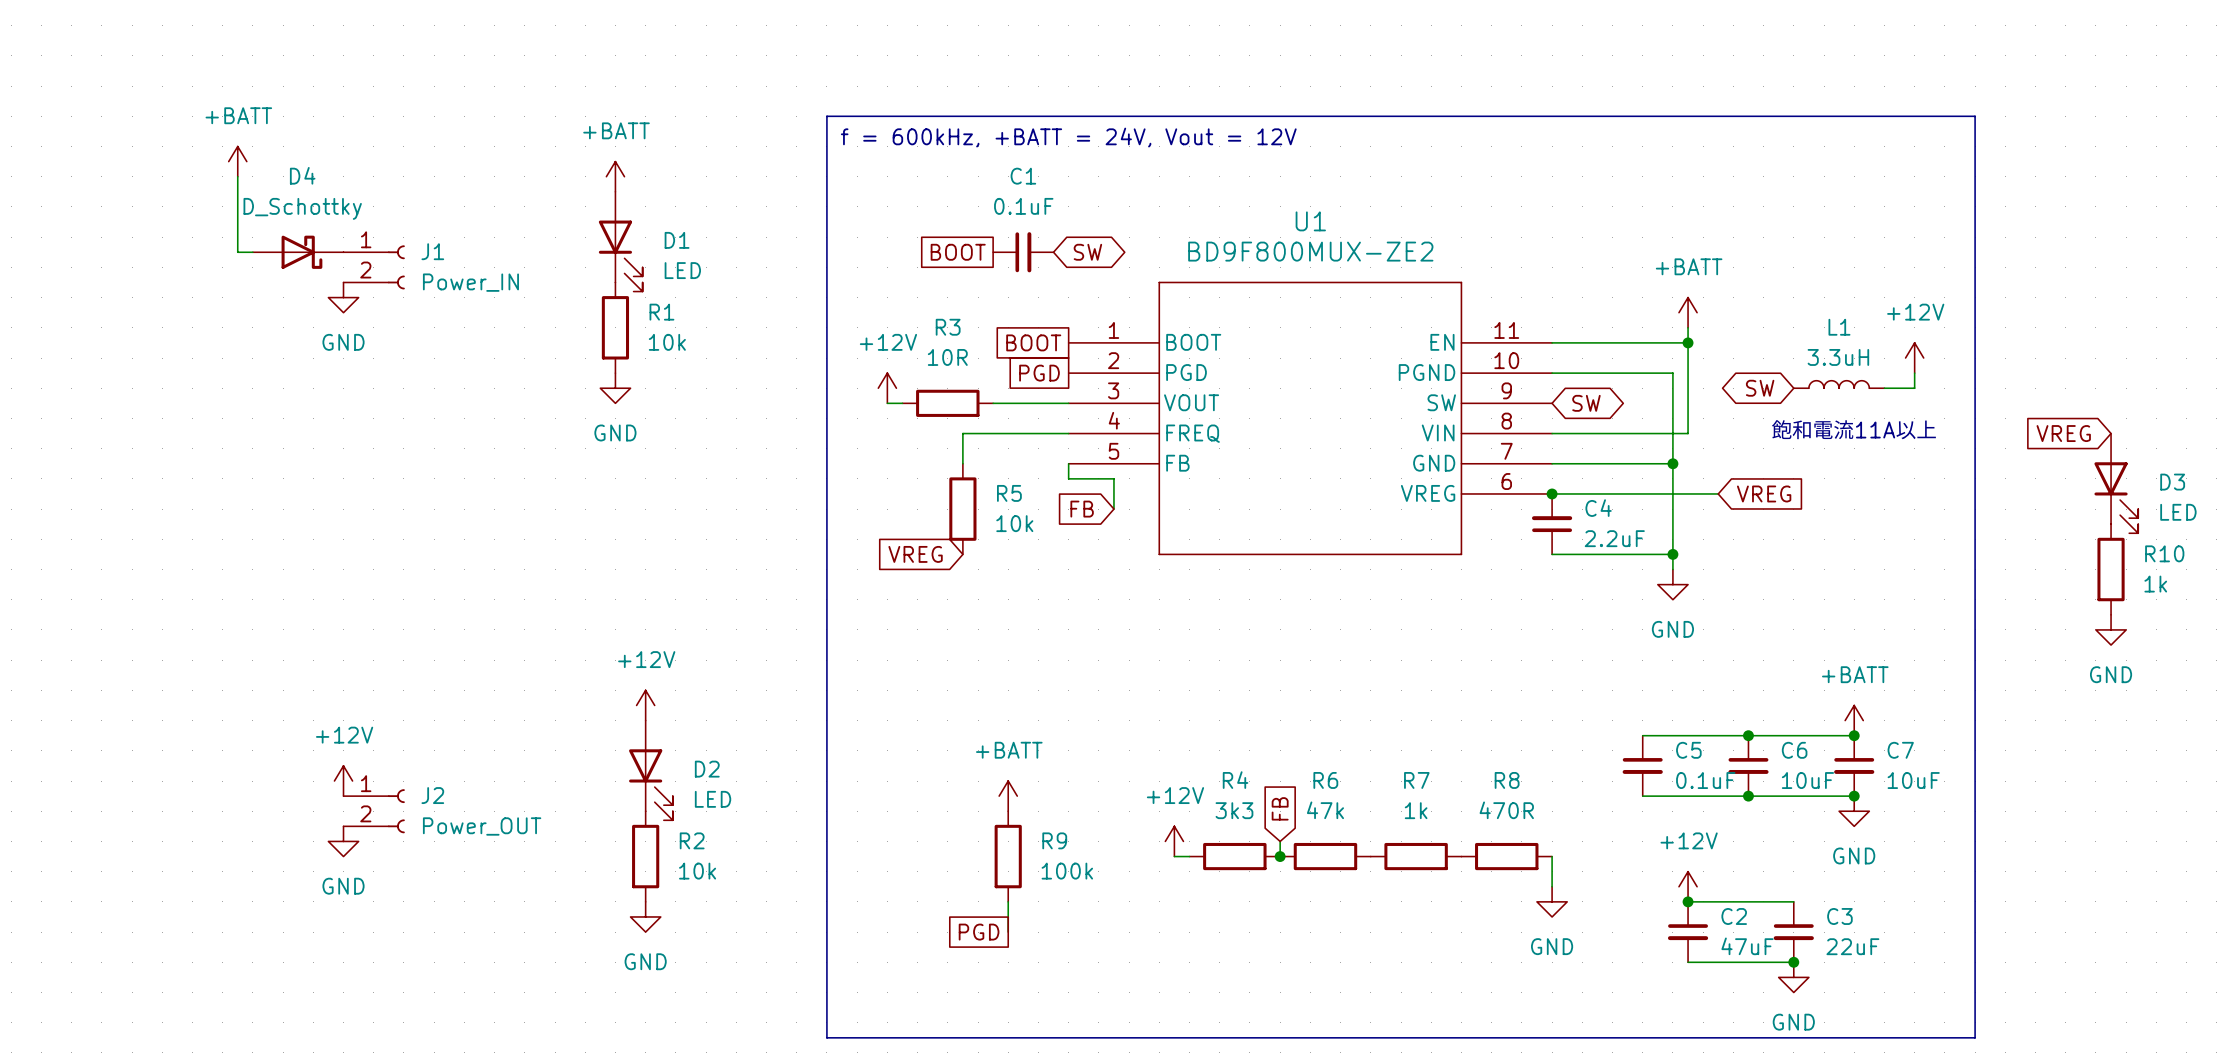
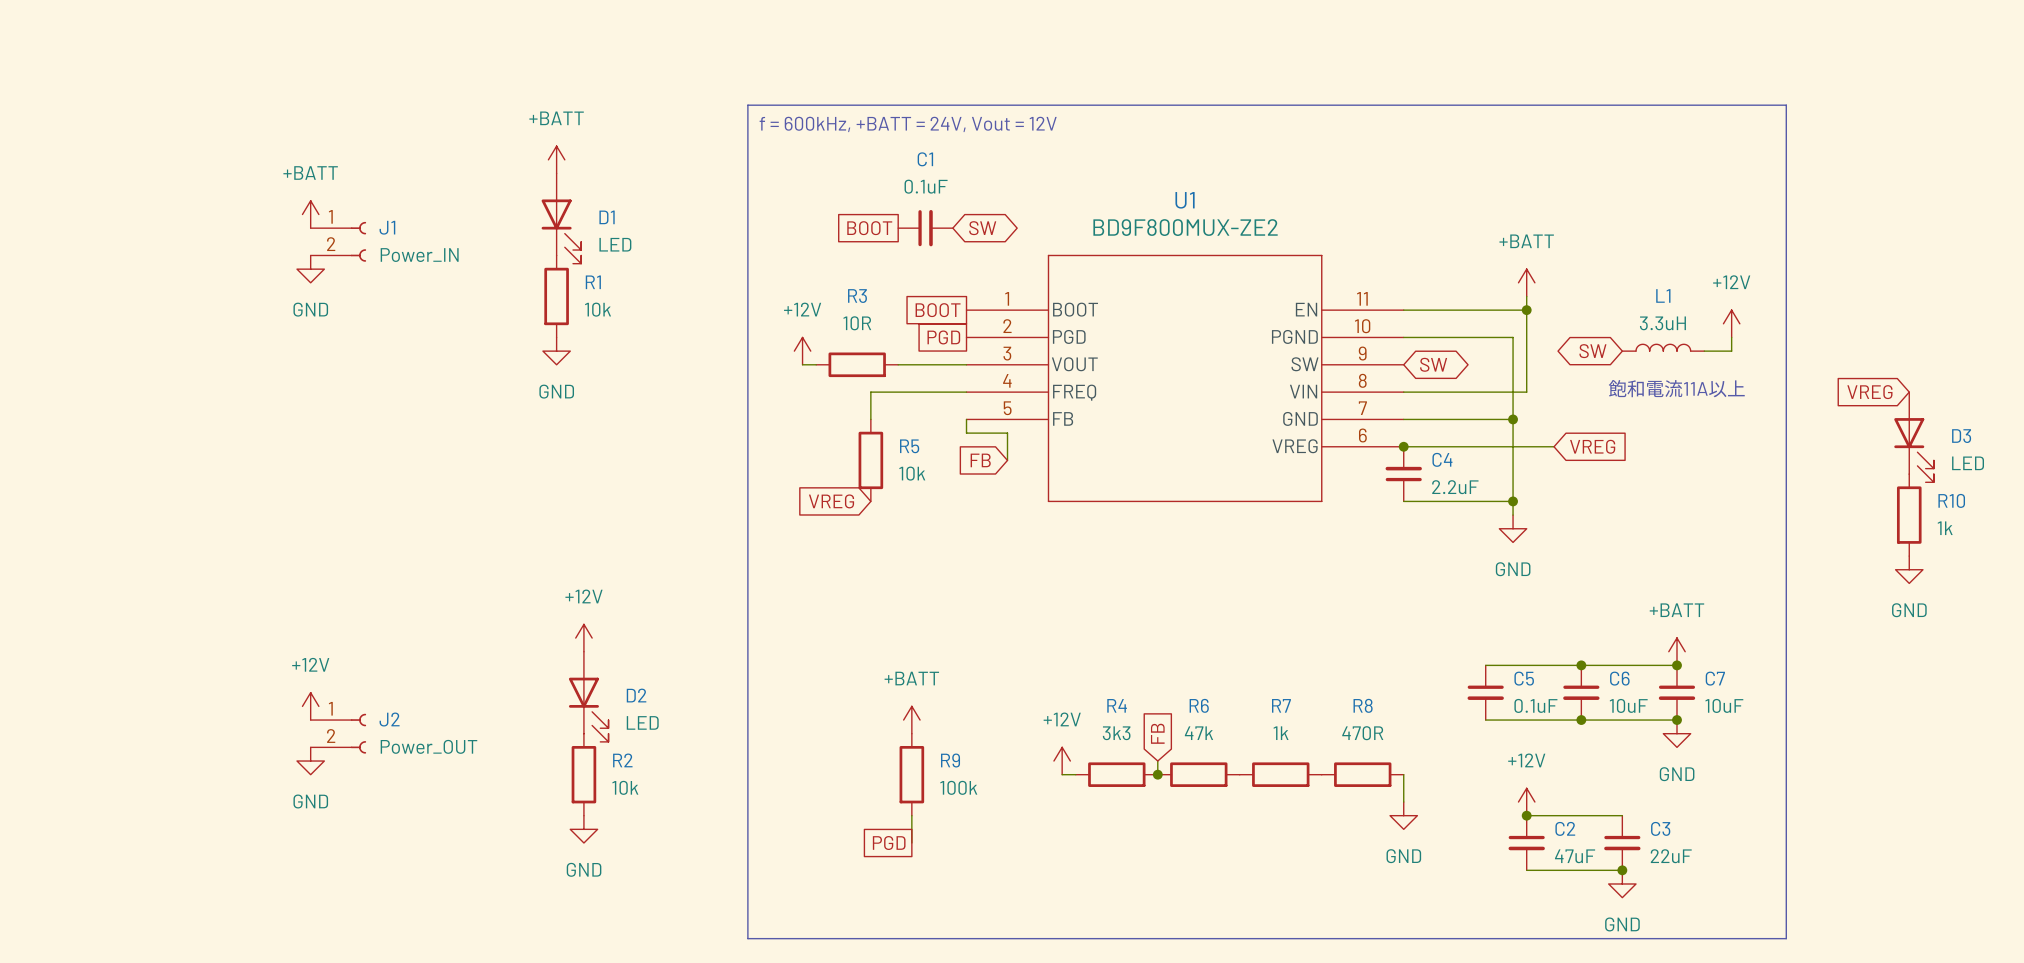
power symbol position: +BATT (237, 161) -> +BATT (310, 214)
wire: (237, 176) (237, 252) (252, 252) -> none
D4: D_Schottky (298, 252) -> none

